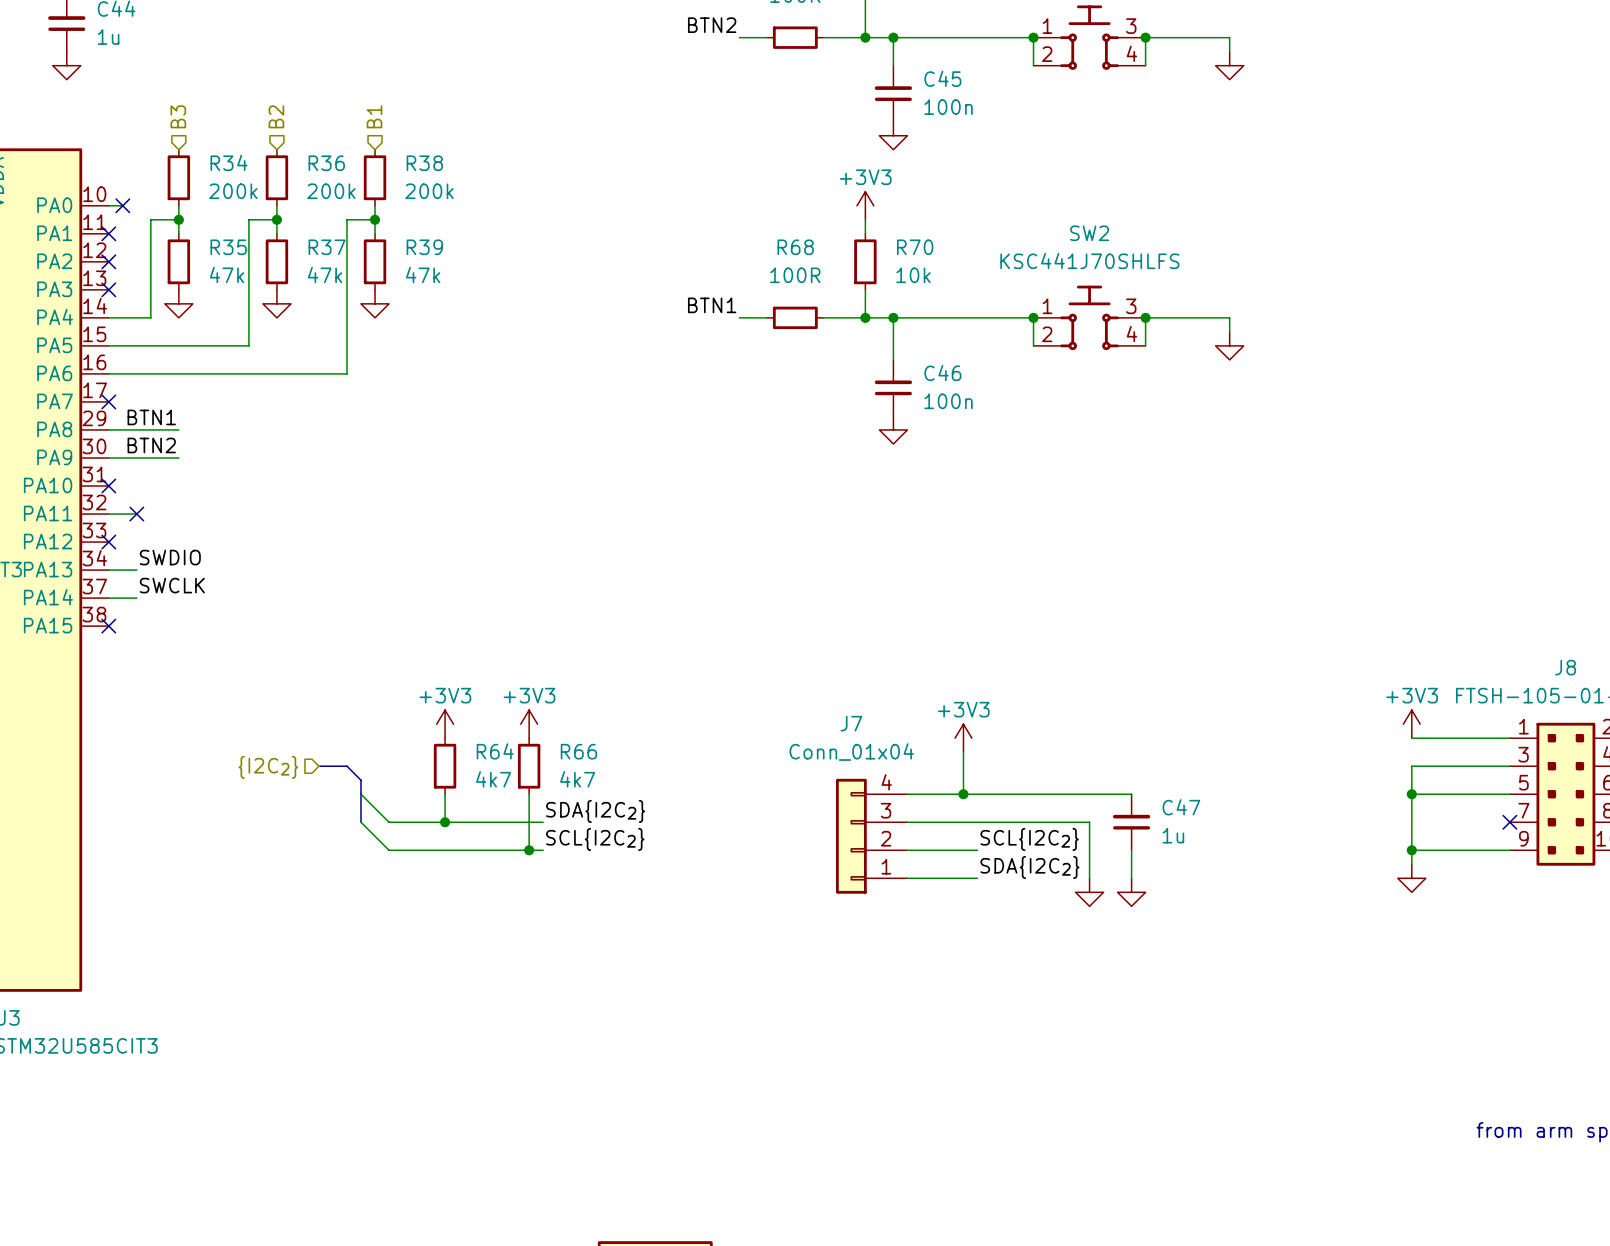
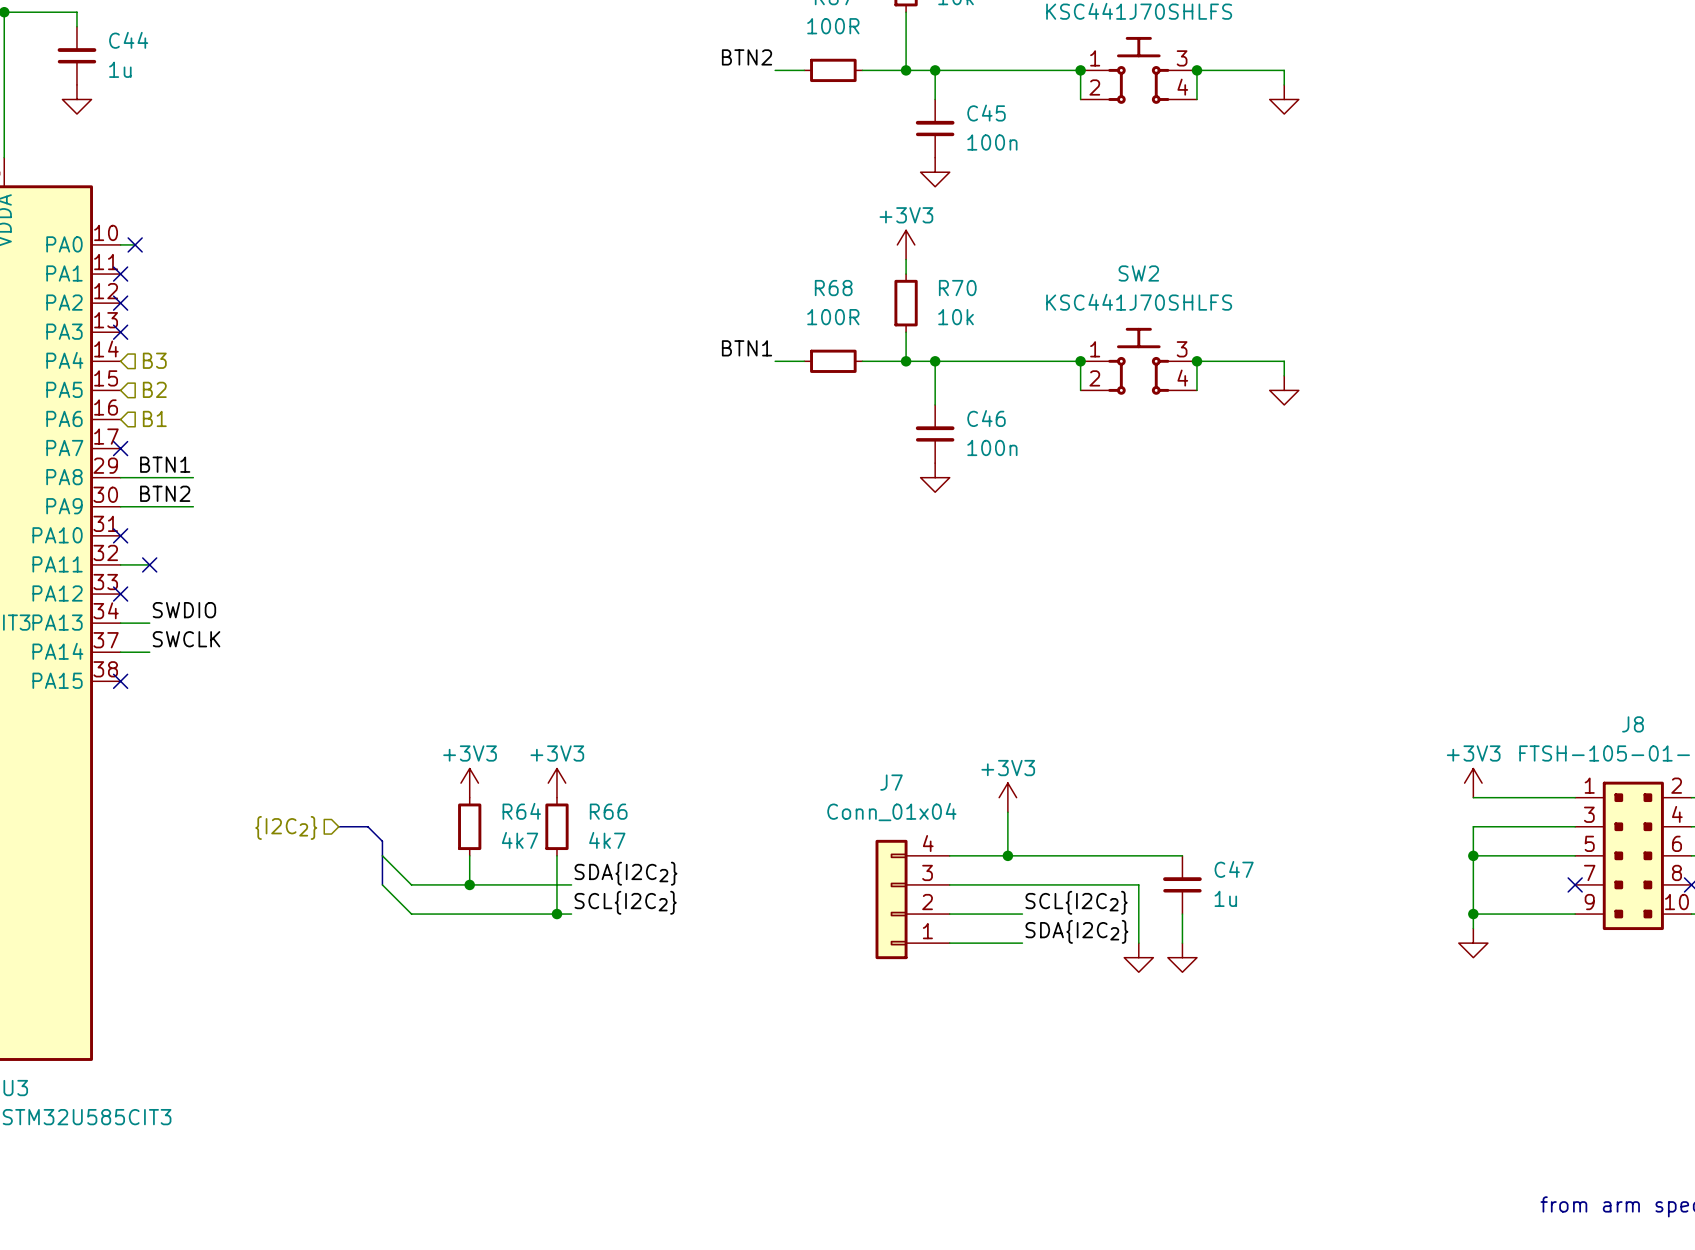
hierarchical label rotation: 0° (178, 116) -> 90° clockwise (154, 360)
hierarchical label position: B3 (178, 116) -> B3 (154, 360)
hierarchical label rotation: 0° (276, 116) -> 90° clockwise (154, 389)
hierarchical label position: B2 (276, 116) -> B2 (154, 389)
hierarchical label: B1 (374, 116) -> none
R34: (178, 177) -> none
R36: (276, 177) -> none
R38: (375, 177) -> none
wire: (178, 205) (178, 233) -> none
wire: (276, 205) (276, 233) -> none
wire: (375, 205) (375, 233) -> none
wire: (178, 219) (150, 219) (150, 317) (108, 317) -> none
junction: (178, 219) -> none
wire: (276, 219) (248, 219) (248, 345) (108, 345) -> none
junction: (276, 219) -> none
wire: (375, 219) (346, 219) (346, 373) (108, 373) -> none
junction: (375, 219) -> none
R35: (178, 261) -> none
R37: (276, 261) -> none
R39: (375, 261) -> none
power symbol: (178, 303) -> none
power symbol: (276, 303) -> none
power symbol: (375, 303) -> none
hierarchical label: none -> B1 (154, 418)

